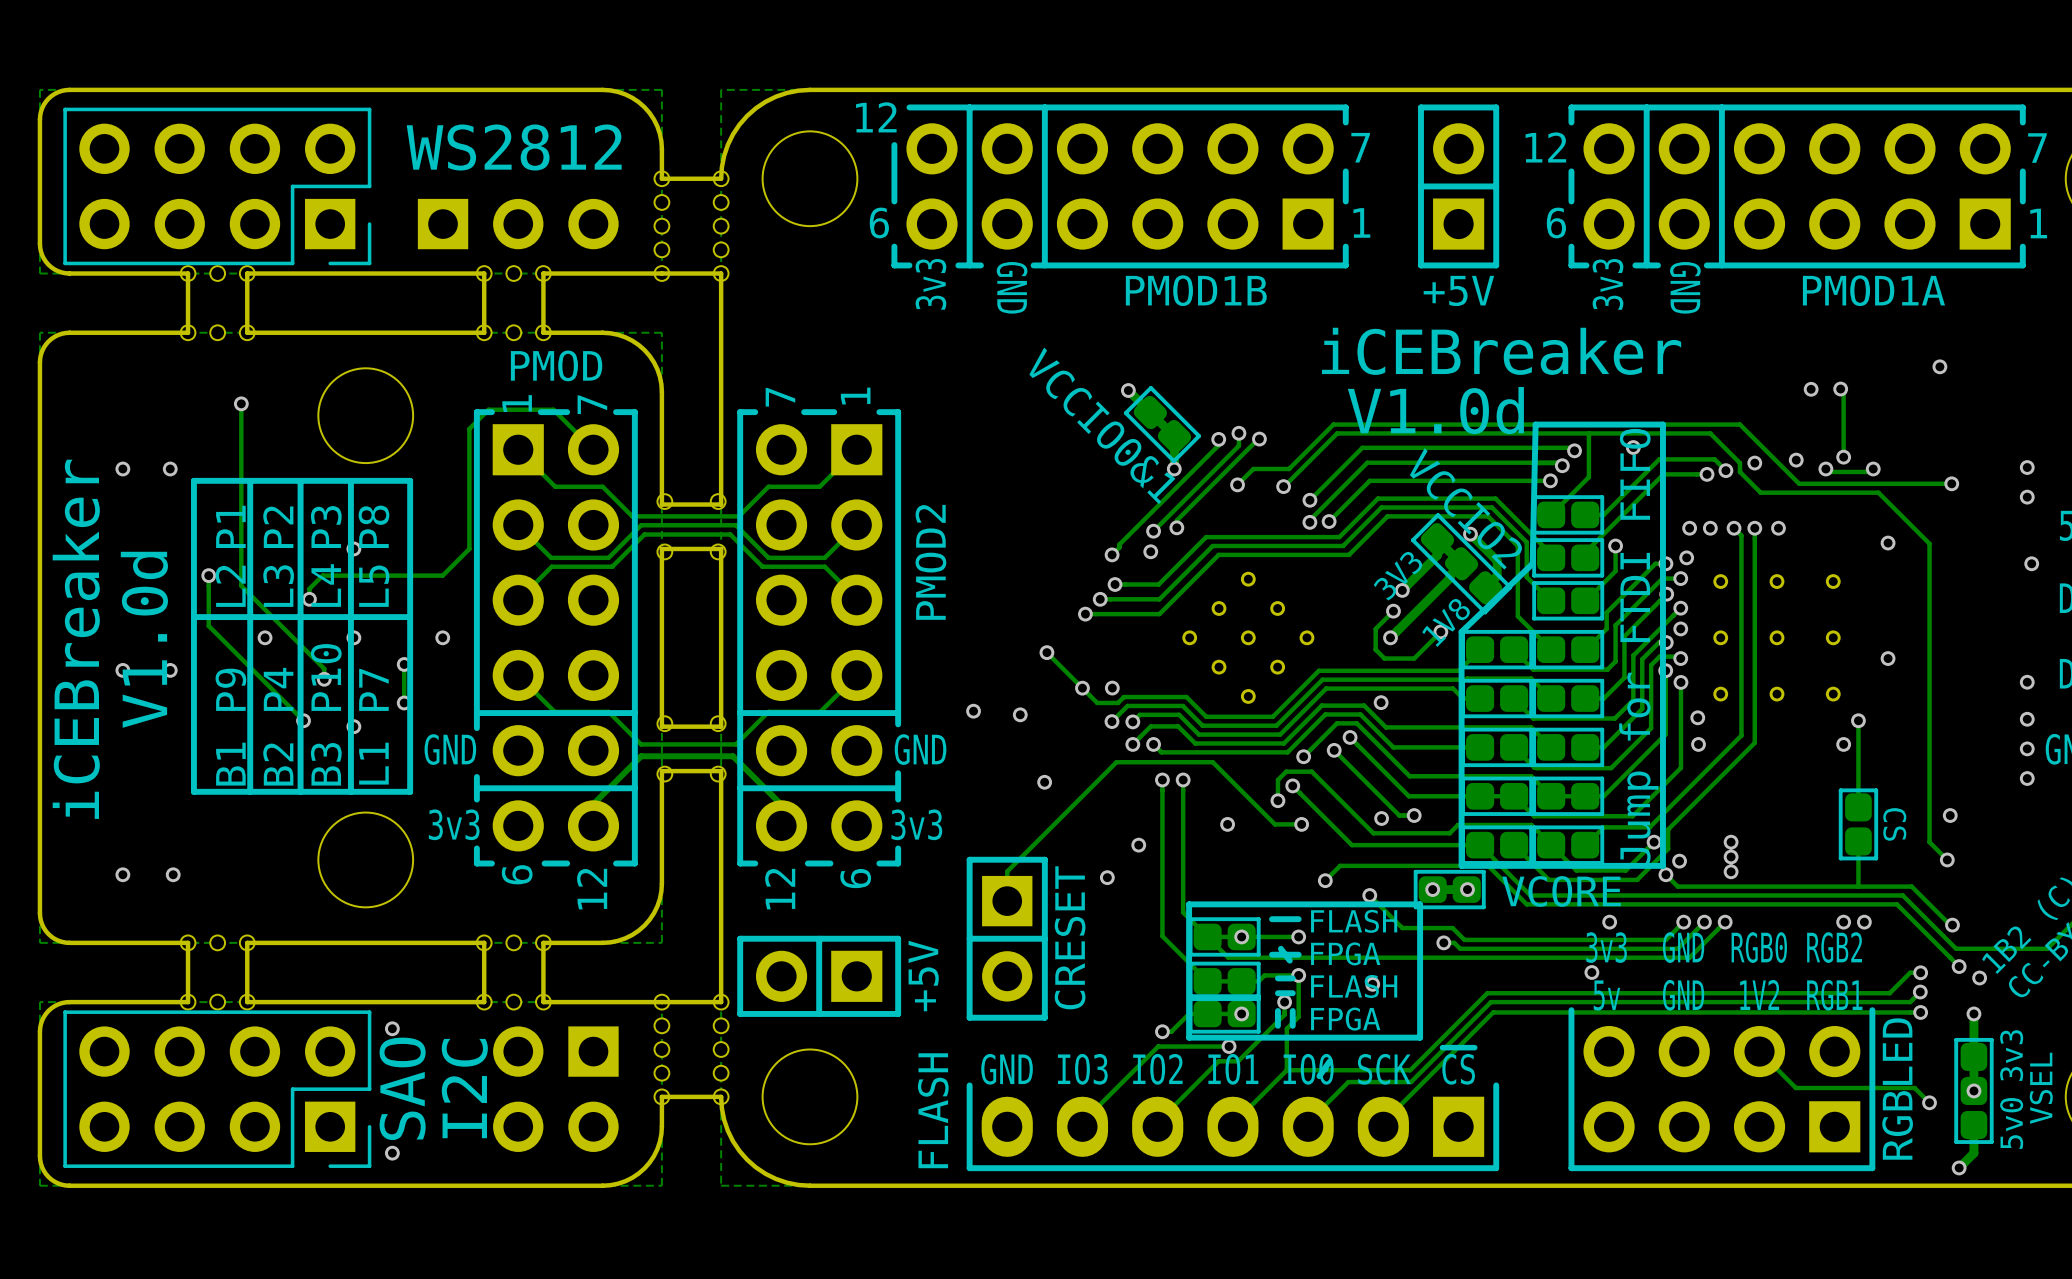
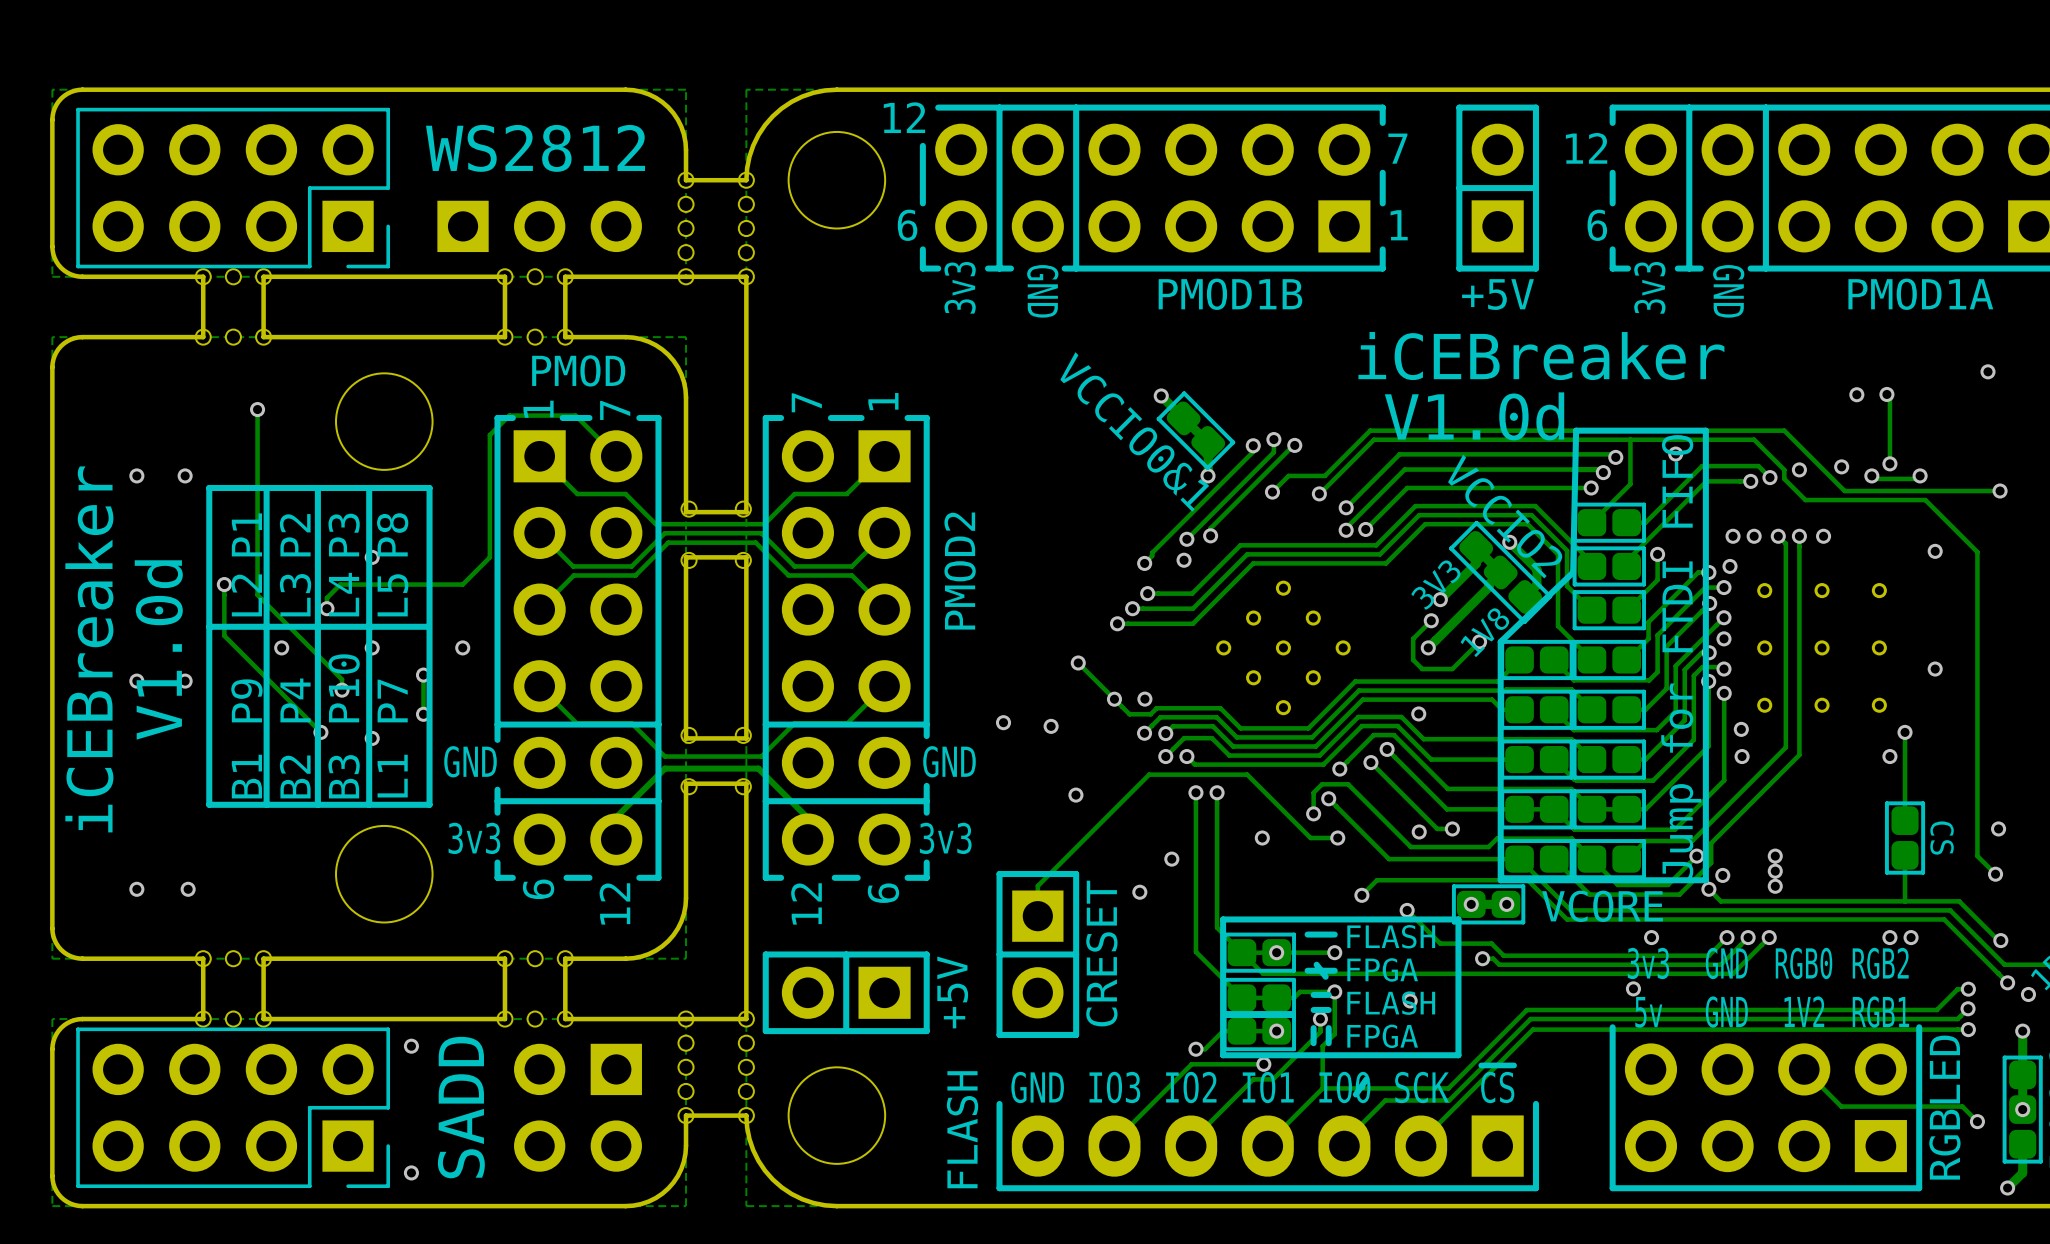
text: SAO (402, 1088) -> none
text: I2C (464, 1088) -> none
text: none -> SADD (461, 1107)

